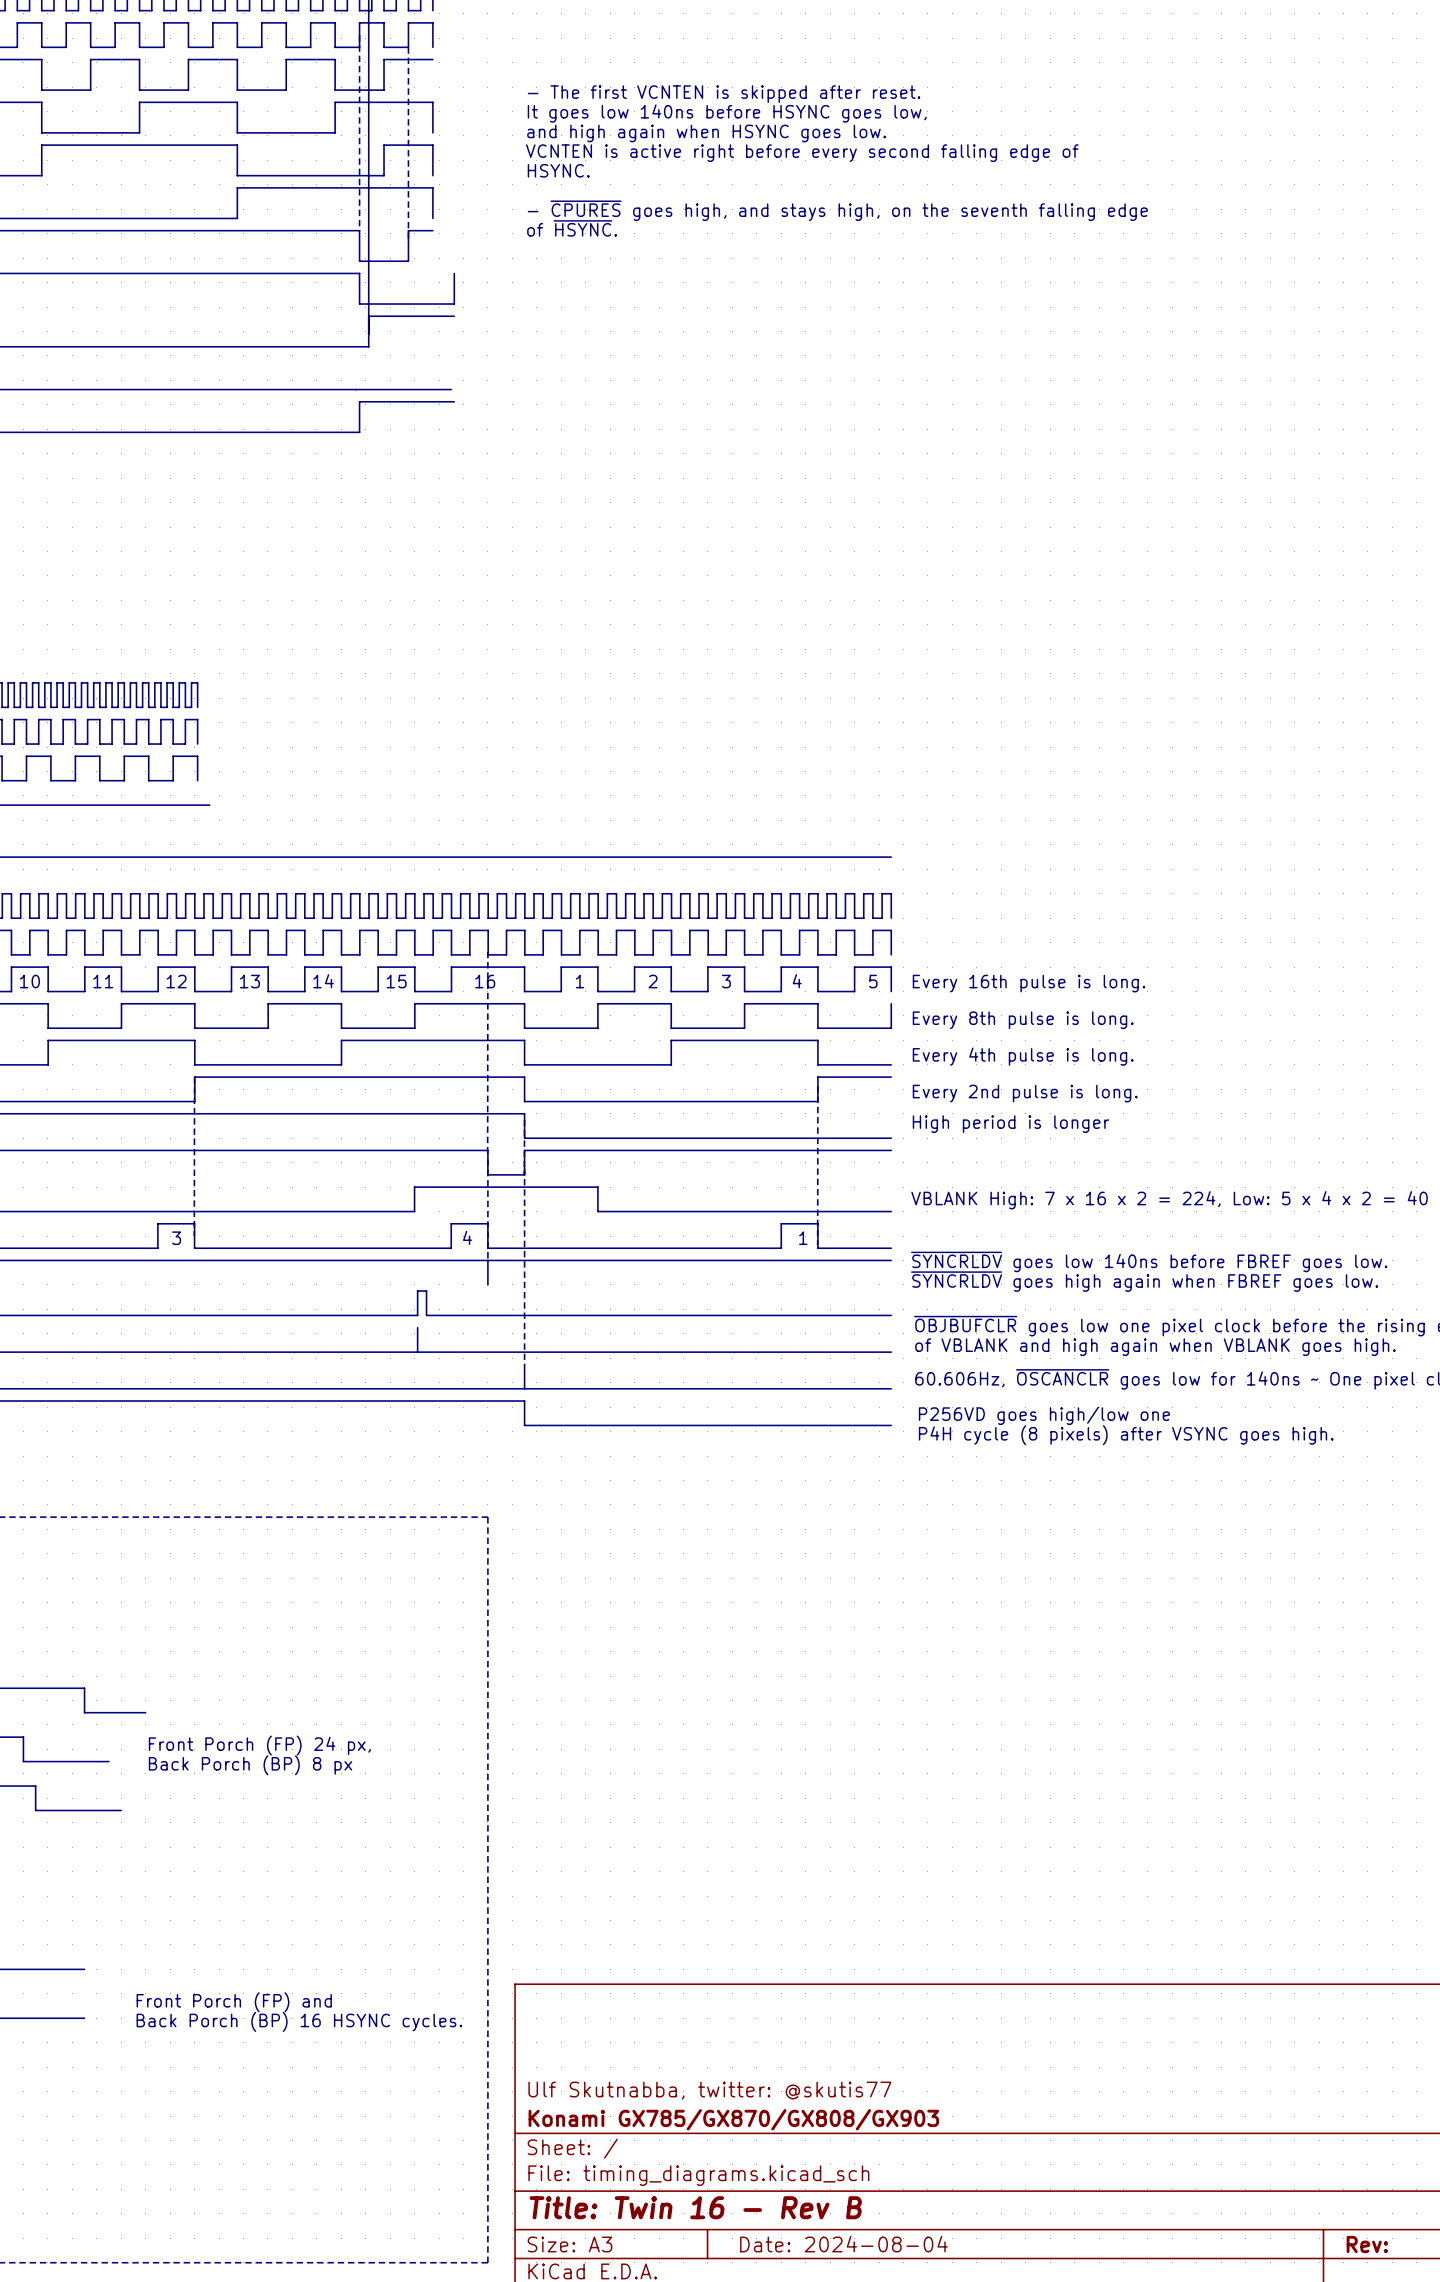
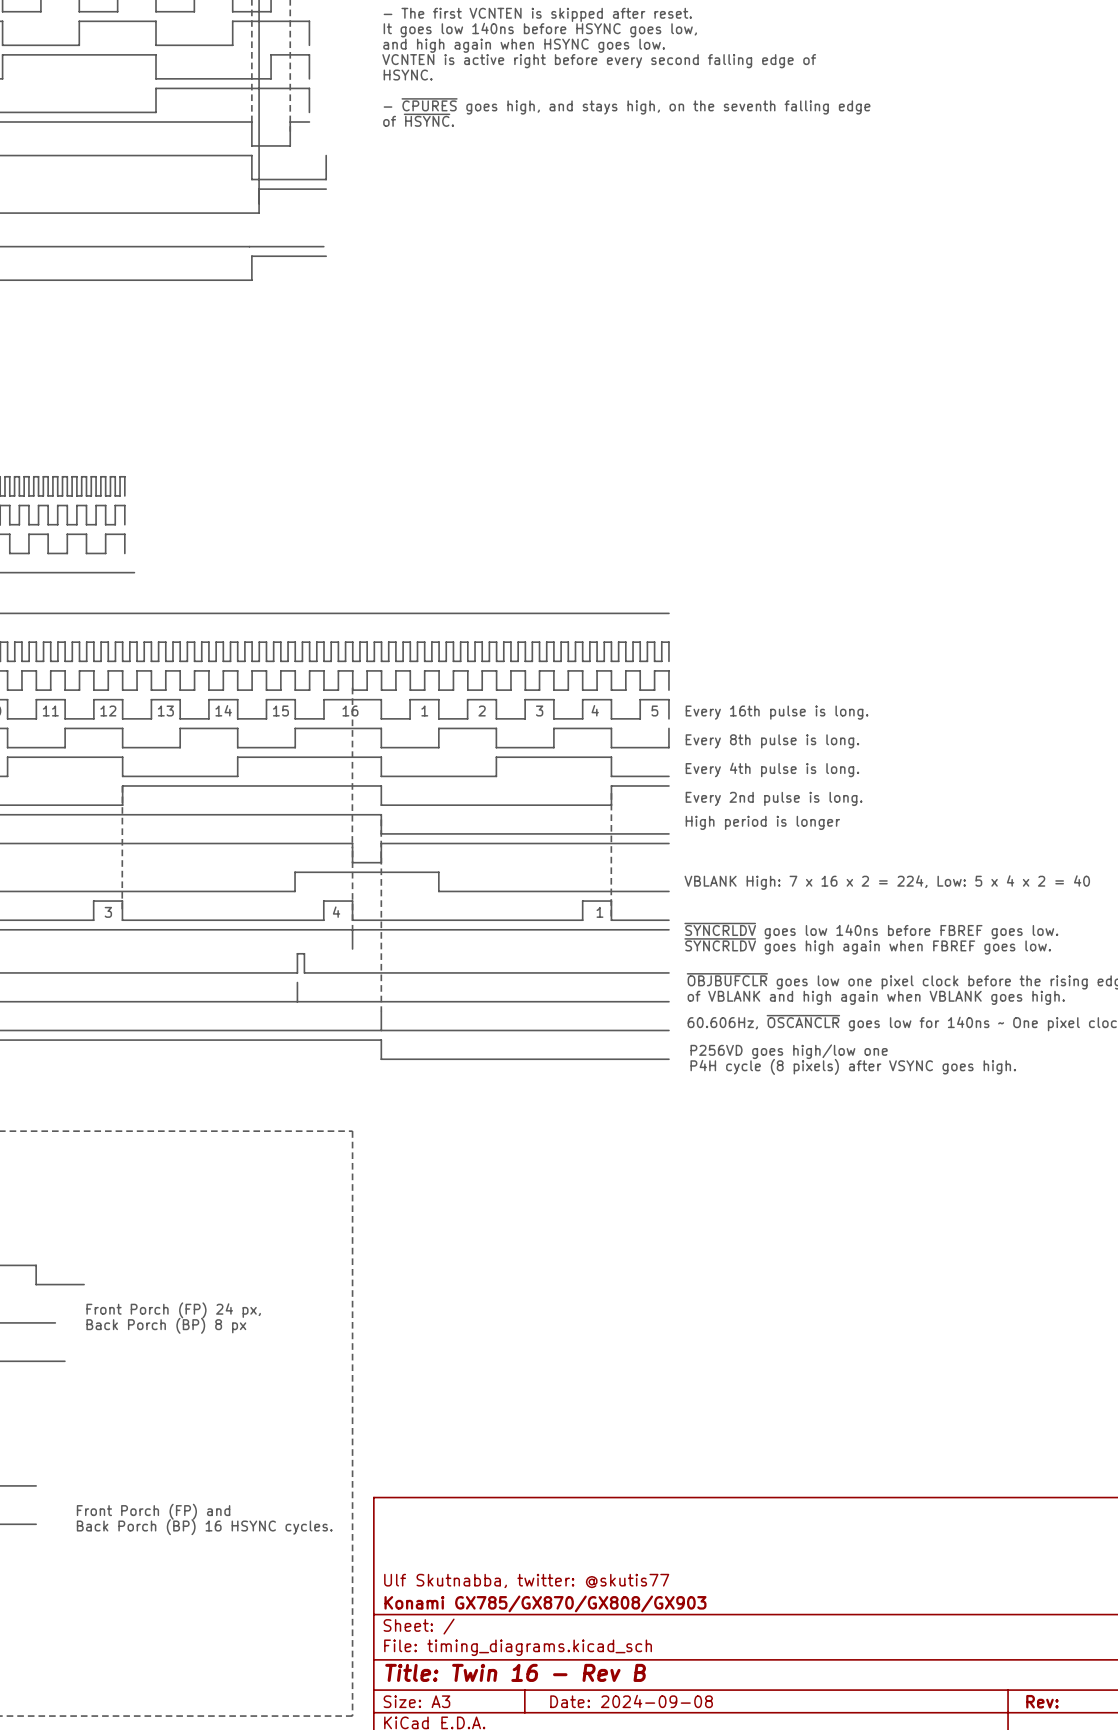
title block: Date: 2024-08-04 (843, 2244) -> Date: 2024-09-08 (631, 1701)

